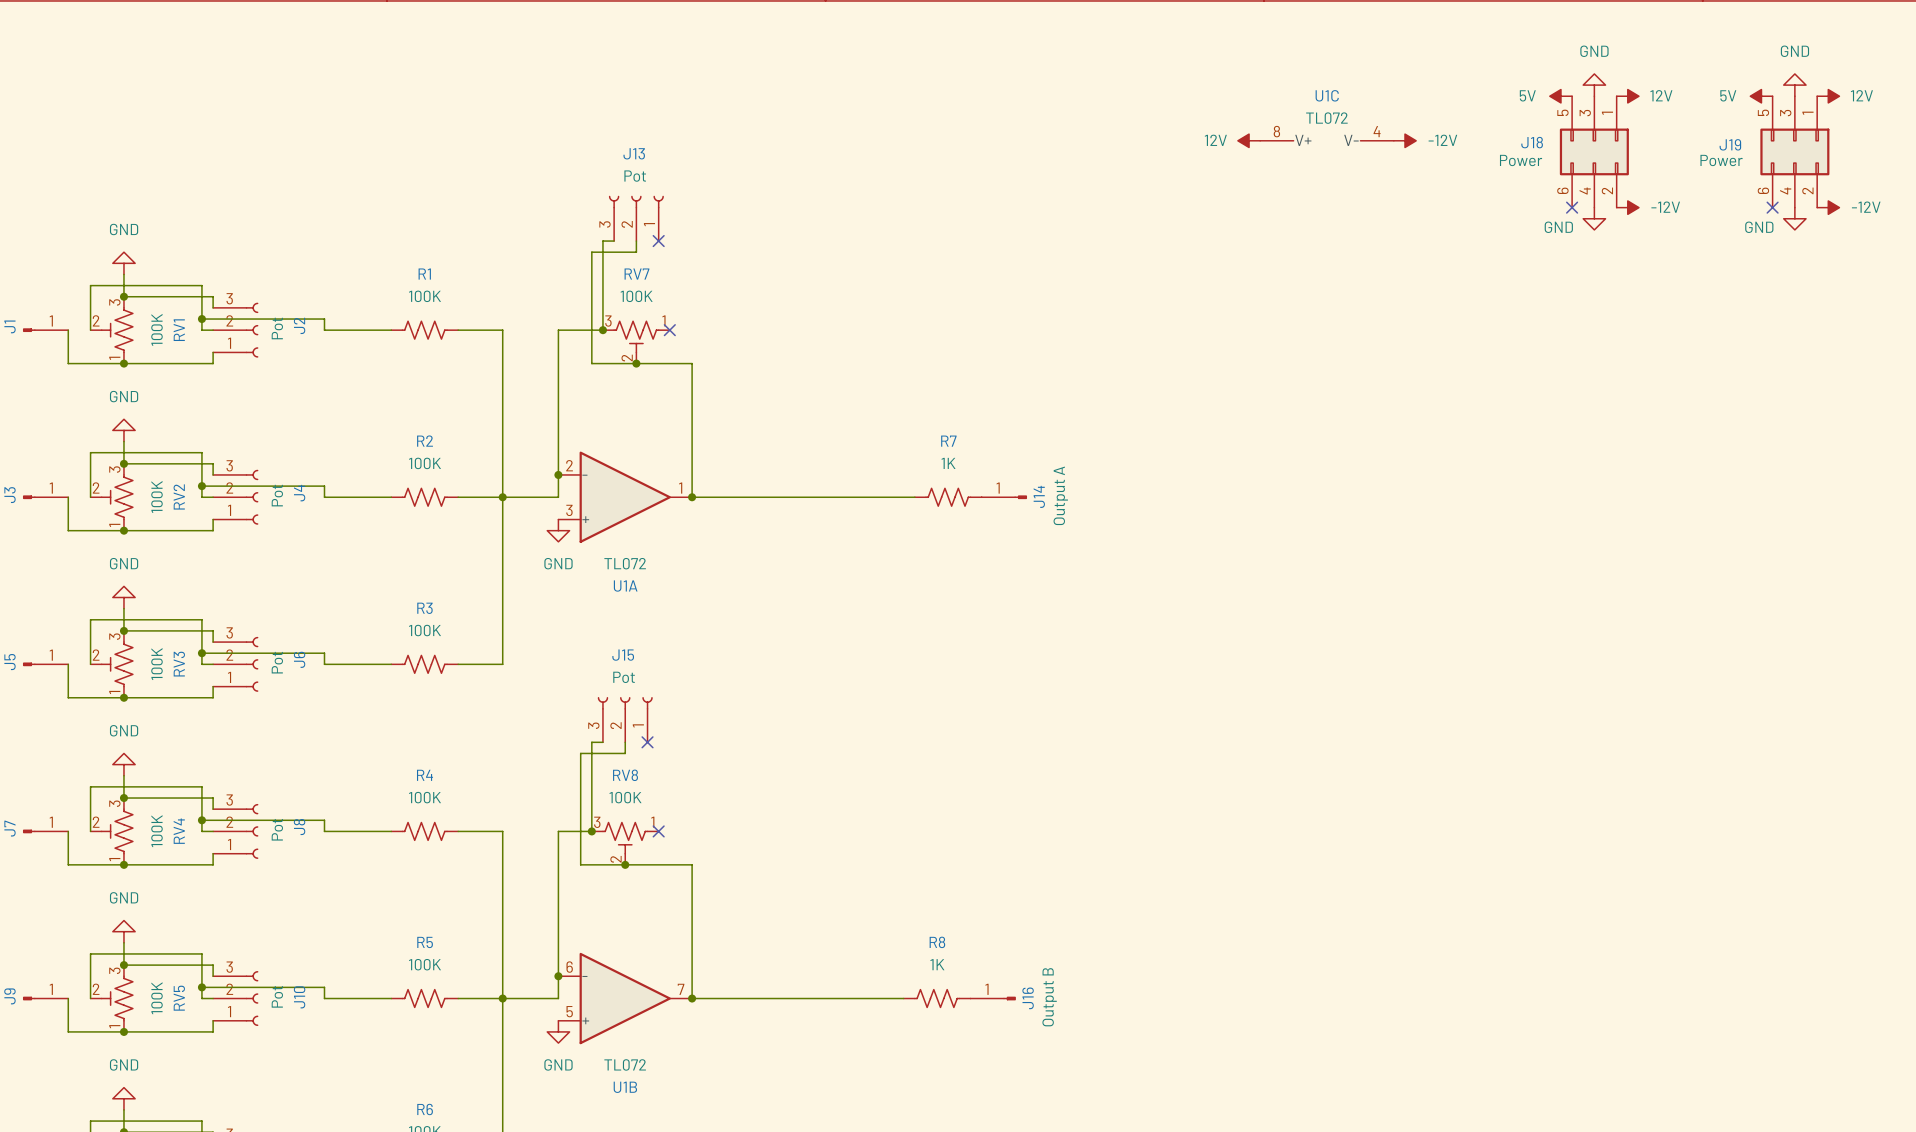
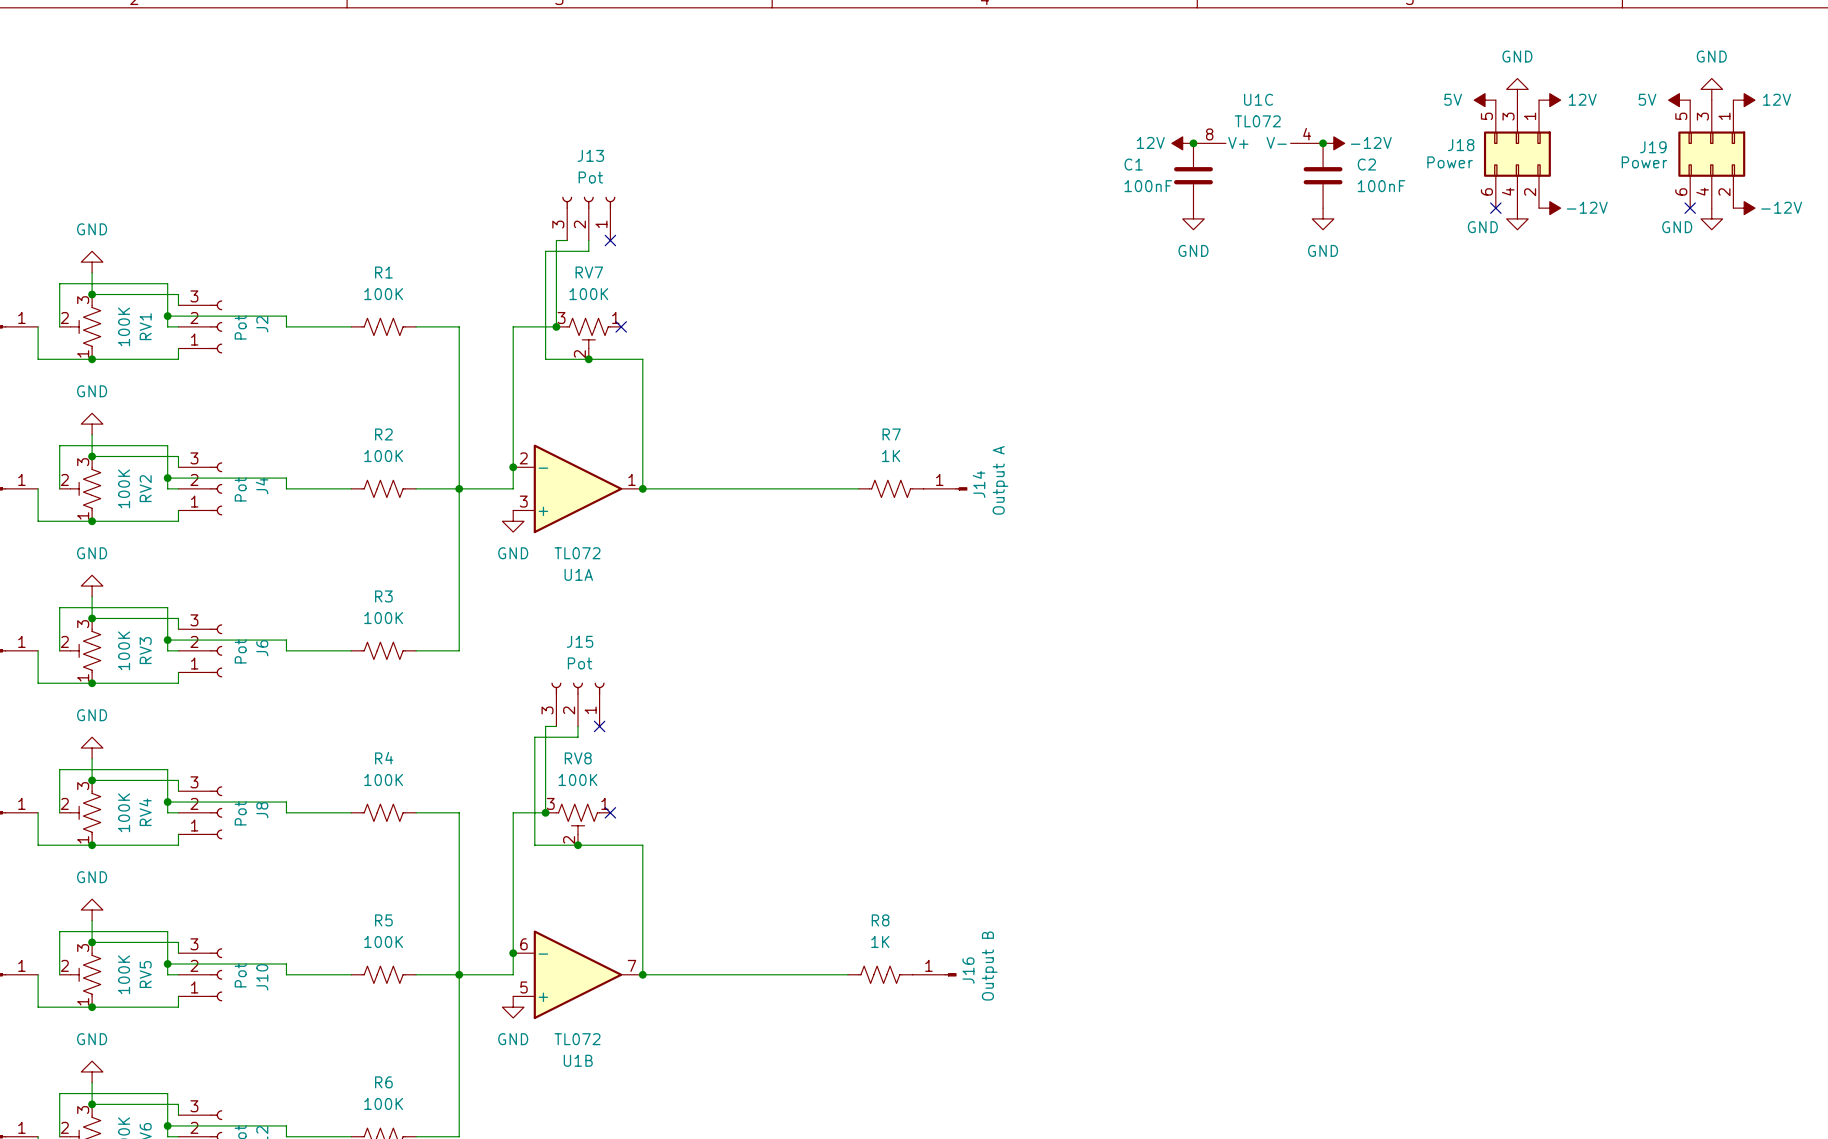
junction: none -> (1193, 143)
junction: none -> (1323, 143)
C1: none -> 100nF (1193, 175)
C2: none -> 100nF (1323, 175)
power symbol: none -> GND (1193, 218)
power symbol: none -> GND (1323, 218)

